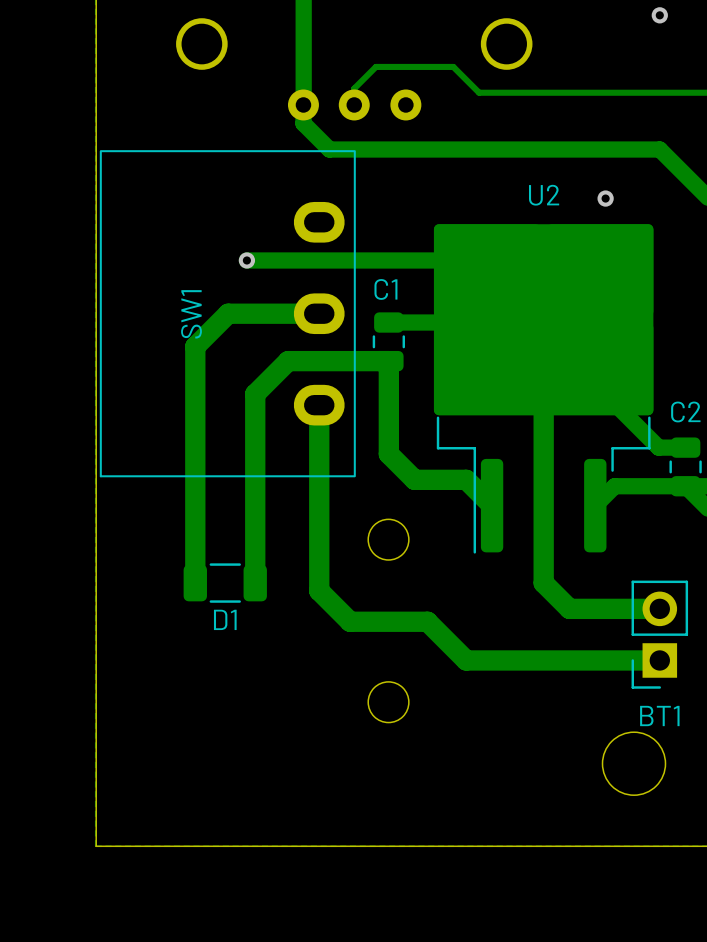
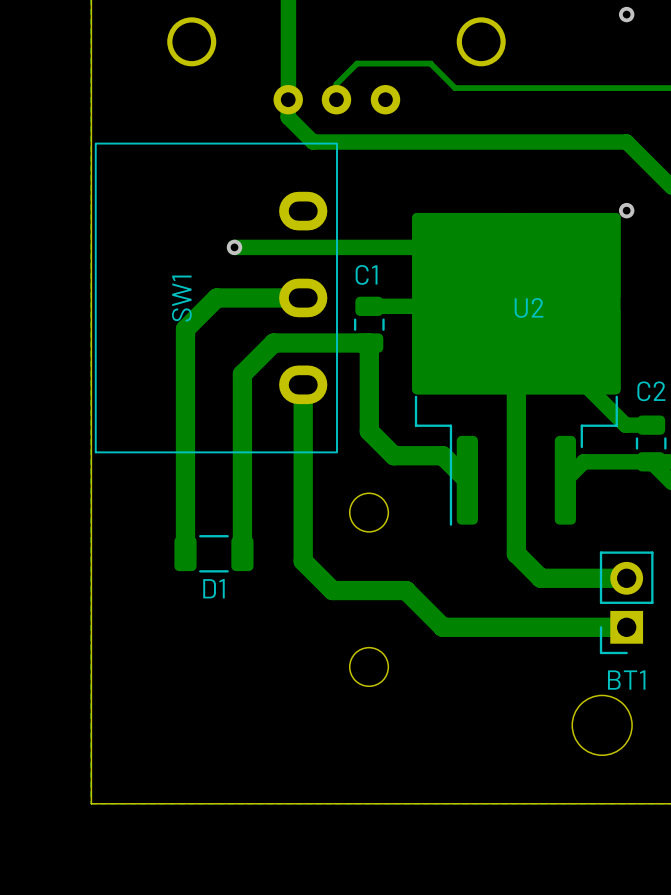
U2 name position: U2 (544, 195) -> U2 (529, 307)
via position: (605, 198) -> (626, 210)

